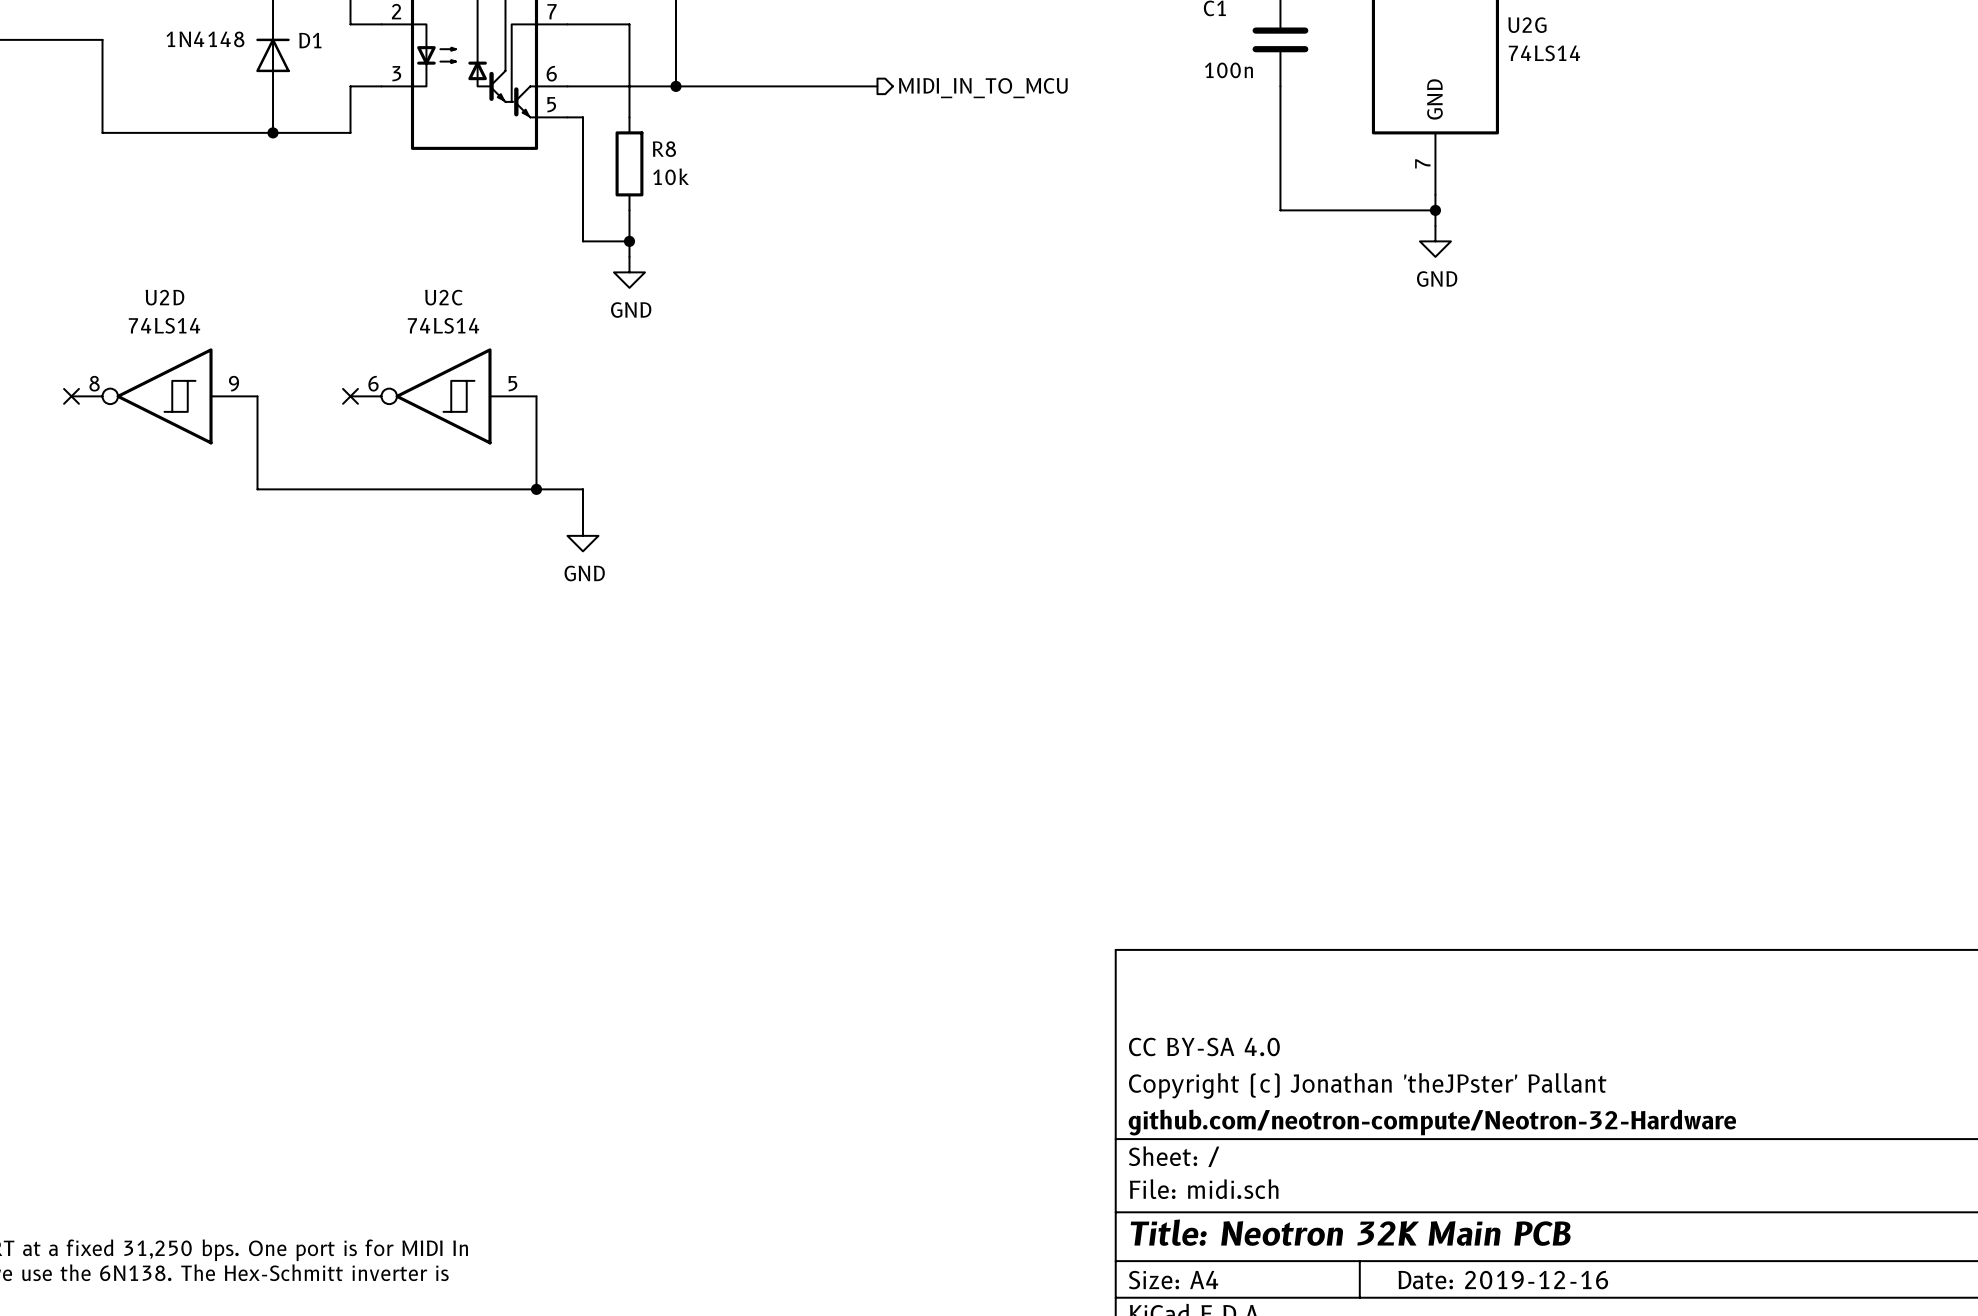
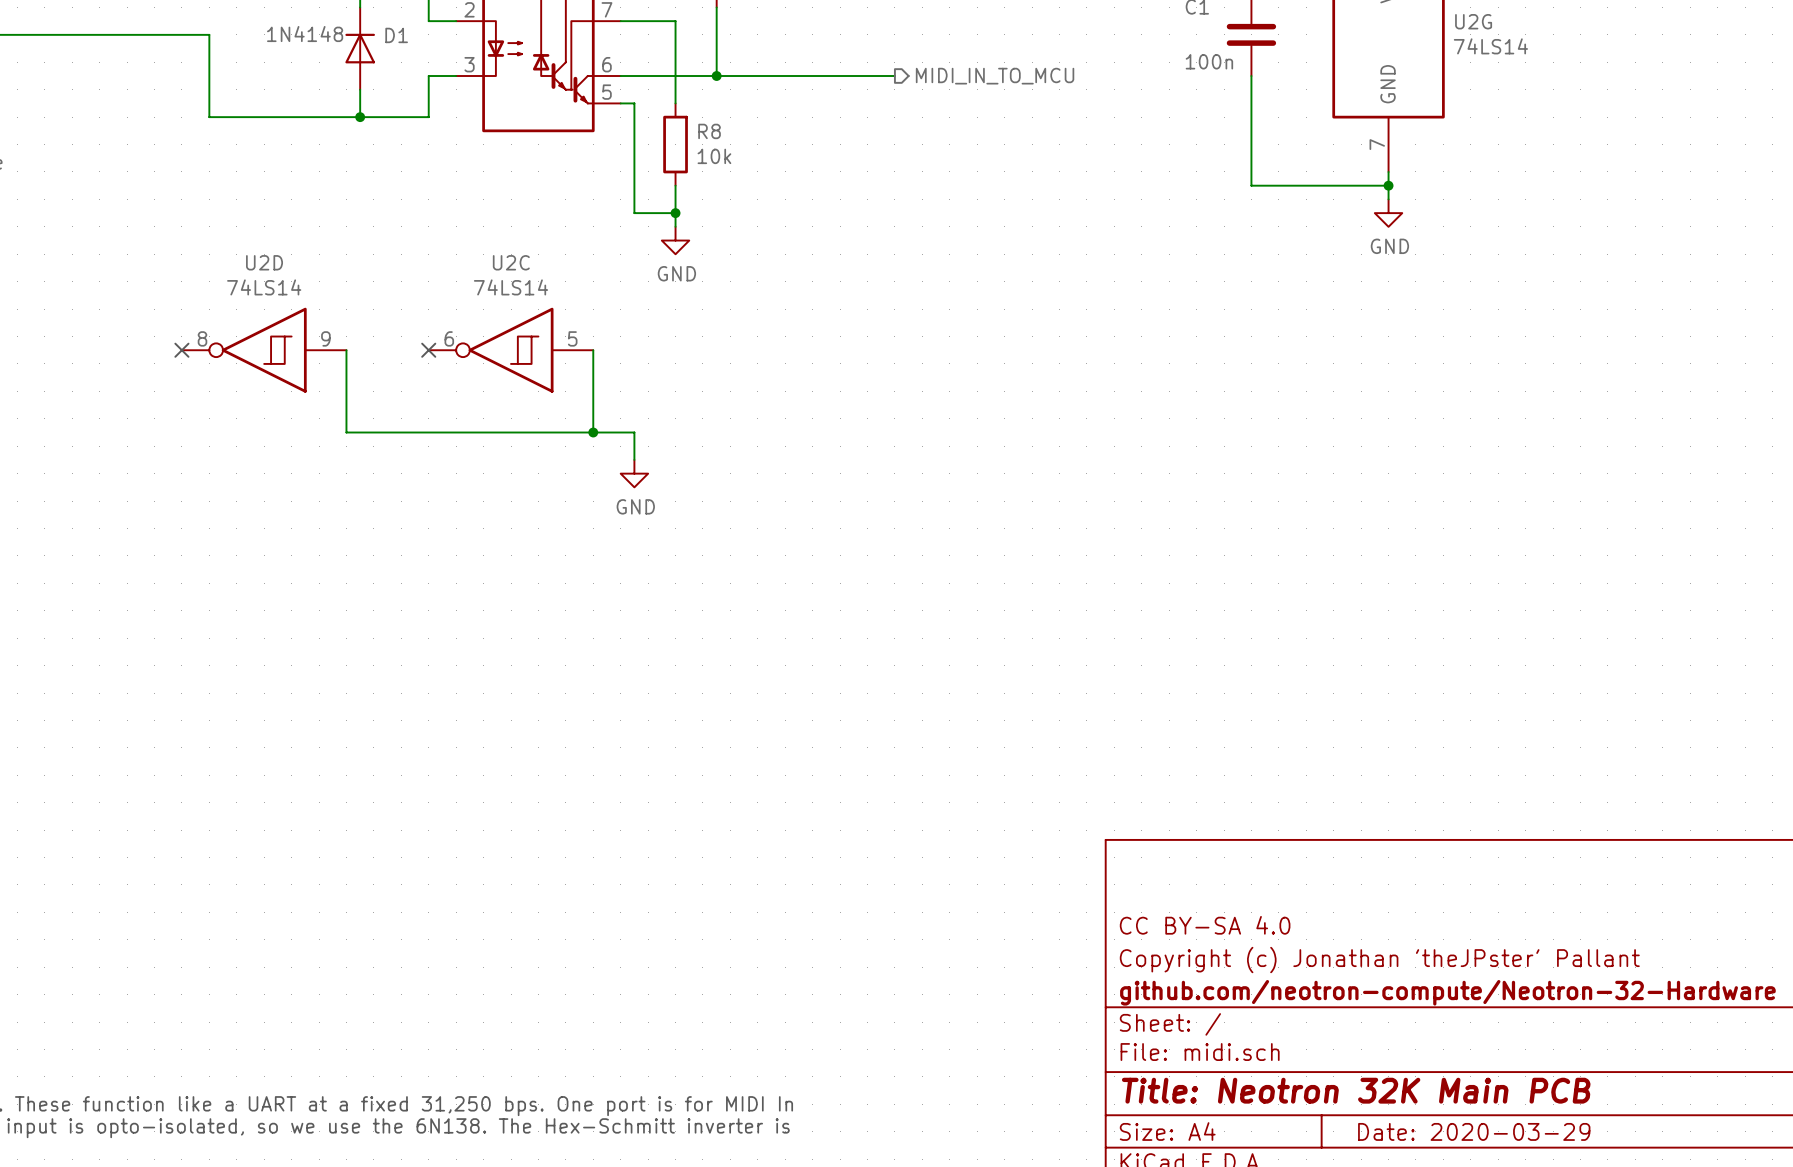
title block: Date: 2019-12-16 (1503, 1280) -> Date: 2020-03-29 (1474, 1131)

